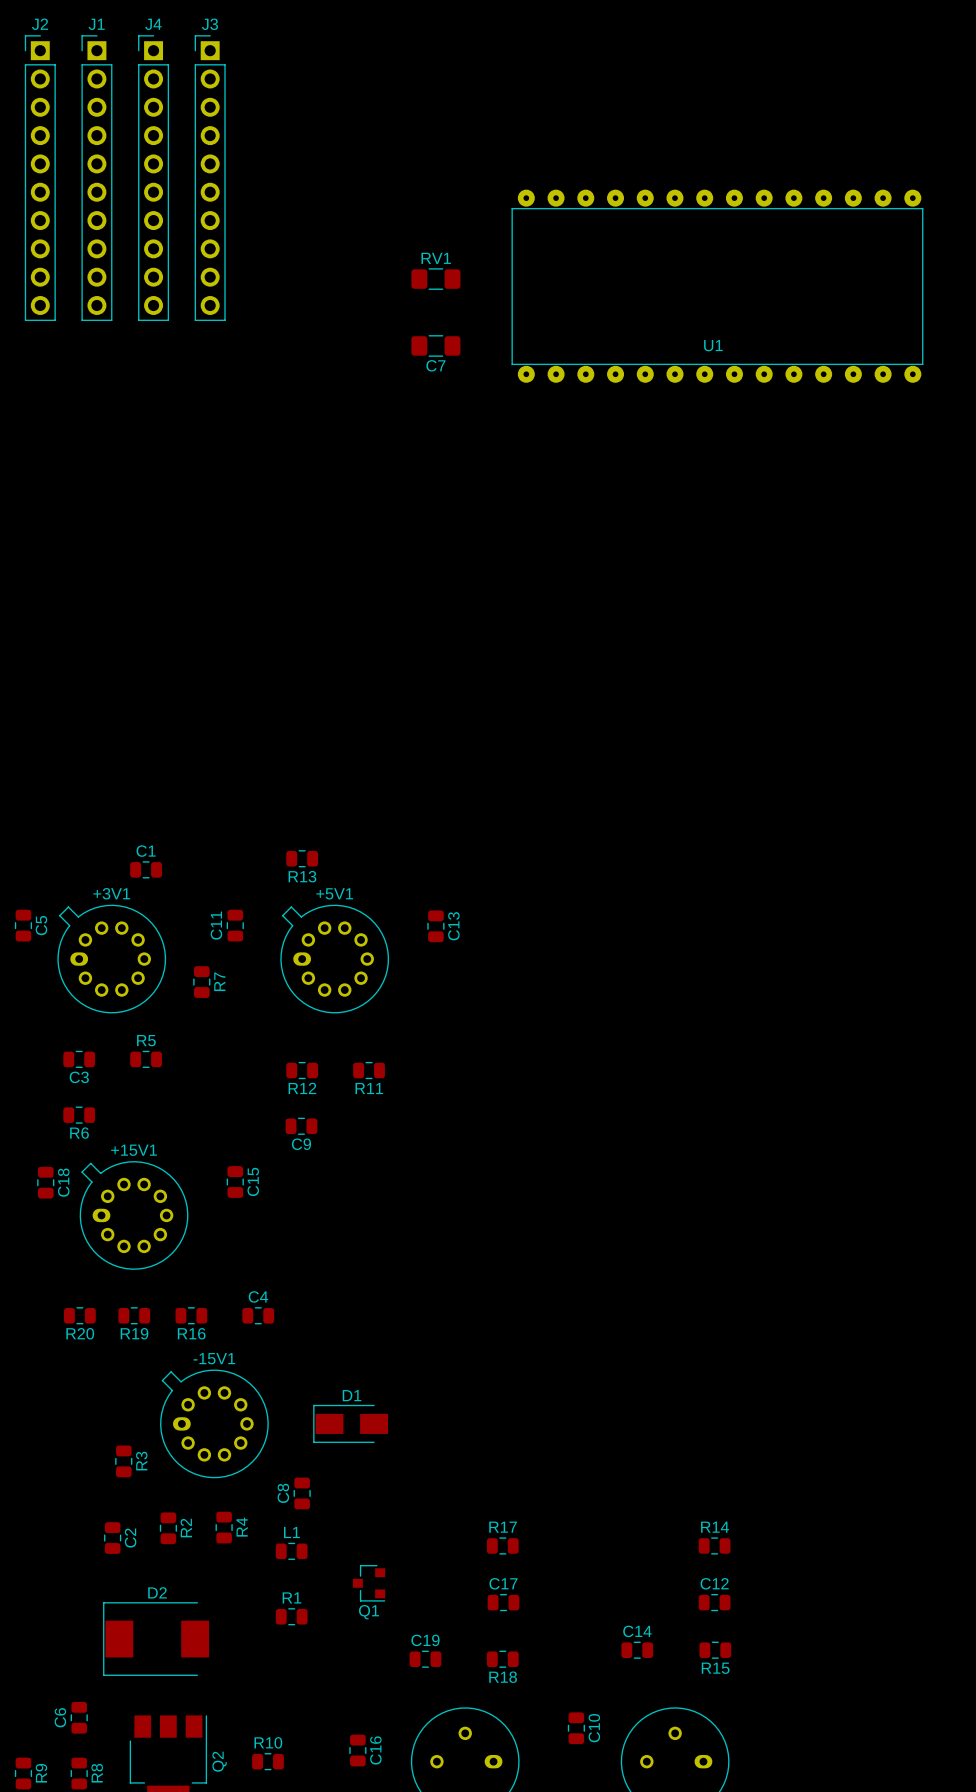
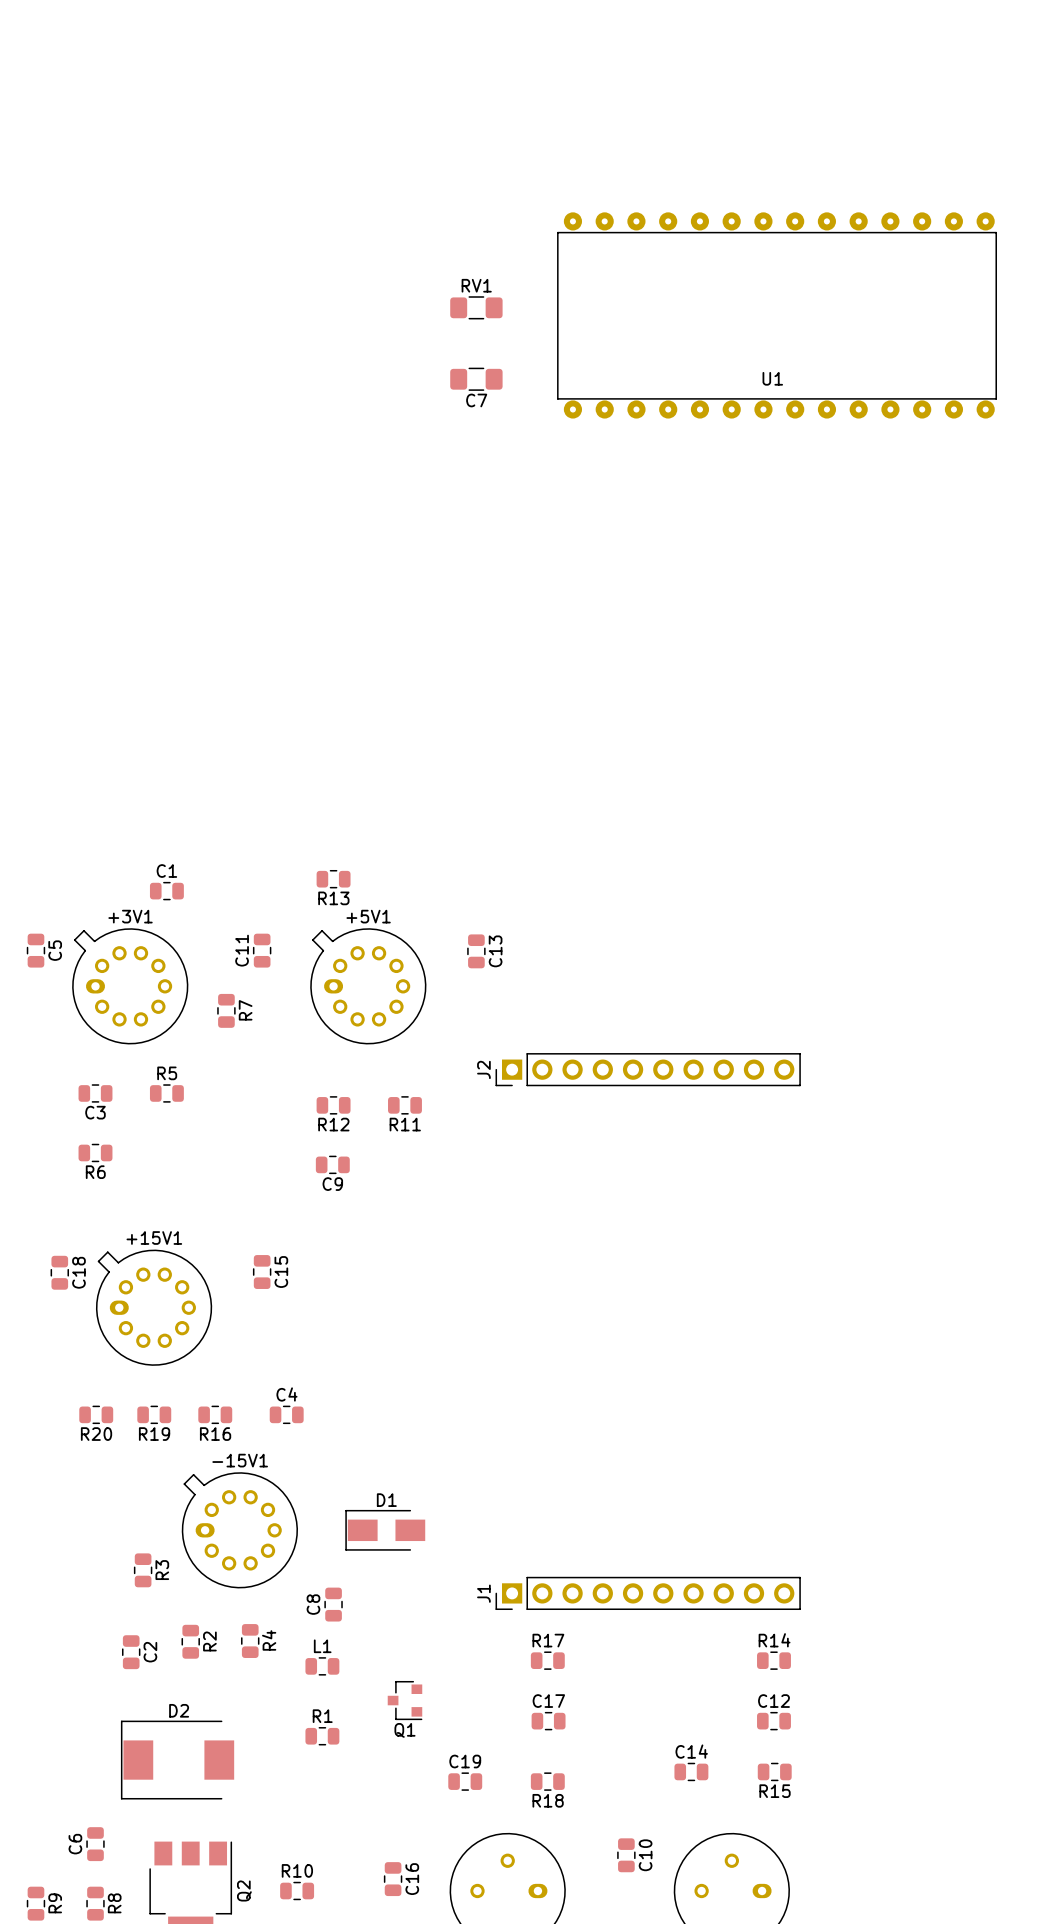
J2 rotation: 0° (40, 178) -> 90° counterclockwise (648, 1069)
J2 position: (40, 178) -> (648, 1069)
J1 rotation: 0° (96, 178) -> 90° counterclockwise (648, 1593)
J1 position: (96, 178) -> (648, 1593)
J4: (153, 178) -> none
J3: (210, 178) -> none
R13 position: (302, 858) -> (333, 879)
C1 position: (146, 869) -> (166, 891)
C5 position: (23, 925) -> (35, 950)
C11 position: (235, 925) -> (262, 950)
C13 position: (435, 926) -> (476, 951)
+3V1 position: (111, 959) -> (130, 986)
+5V1 position: (334, 959) -> (368, 986)
R7 position: (201, 982) -> (226, 1010)
C3 position: (79, 1059) -> (95, 1093)
R5 position: (146, 1059) -> (166, 1093)
R12 position: (302, 1070) -> (333, 1105)
R11 position: (369, 1070) -> (404, 1105)
R6 position: (79, 1115) -> (95, 1152)
C9 position: (301, 1126) -> (332, 1164)

